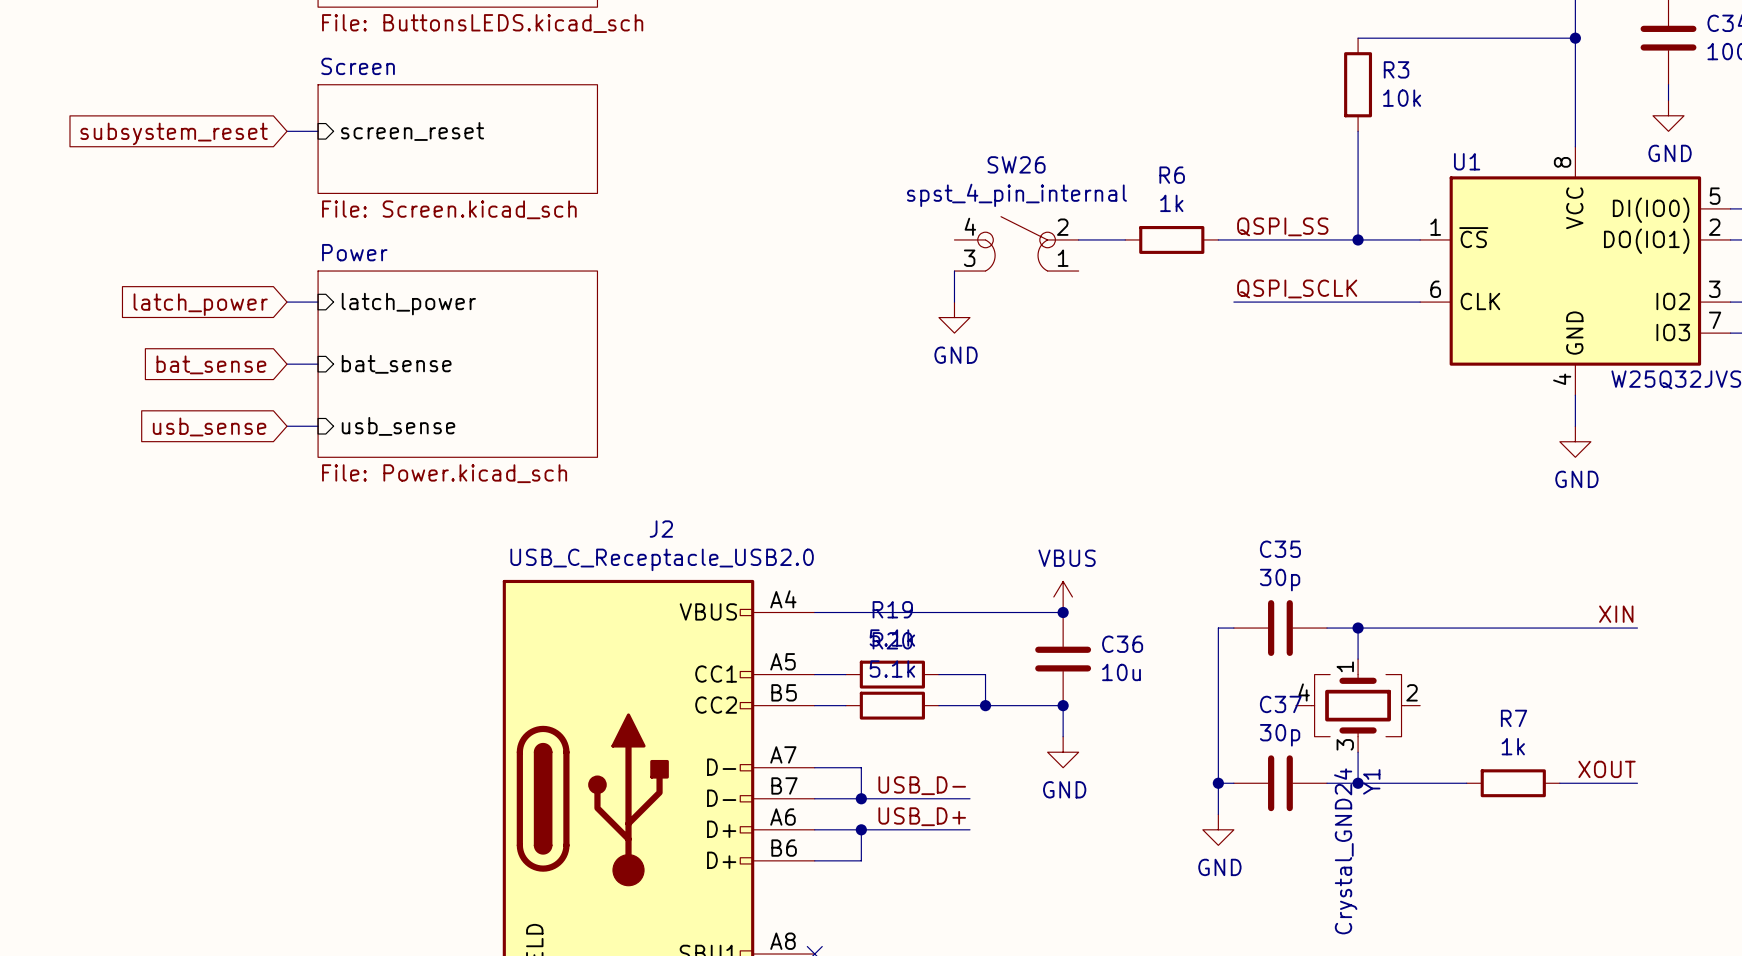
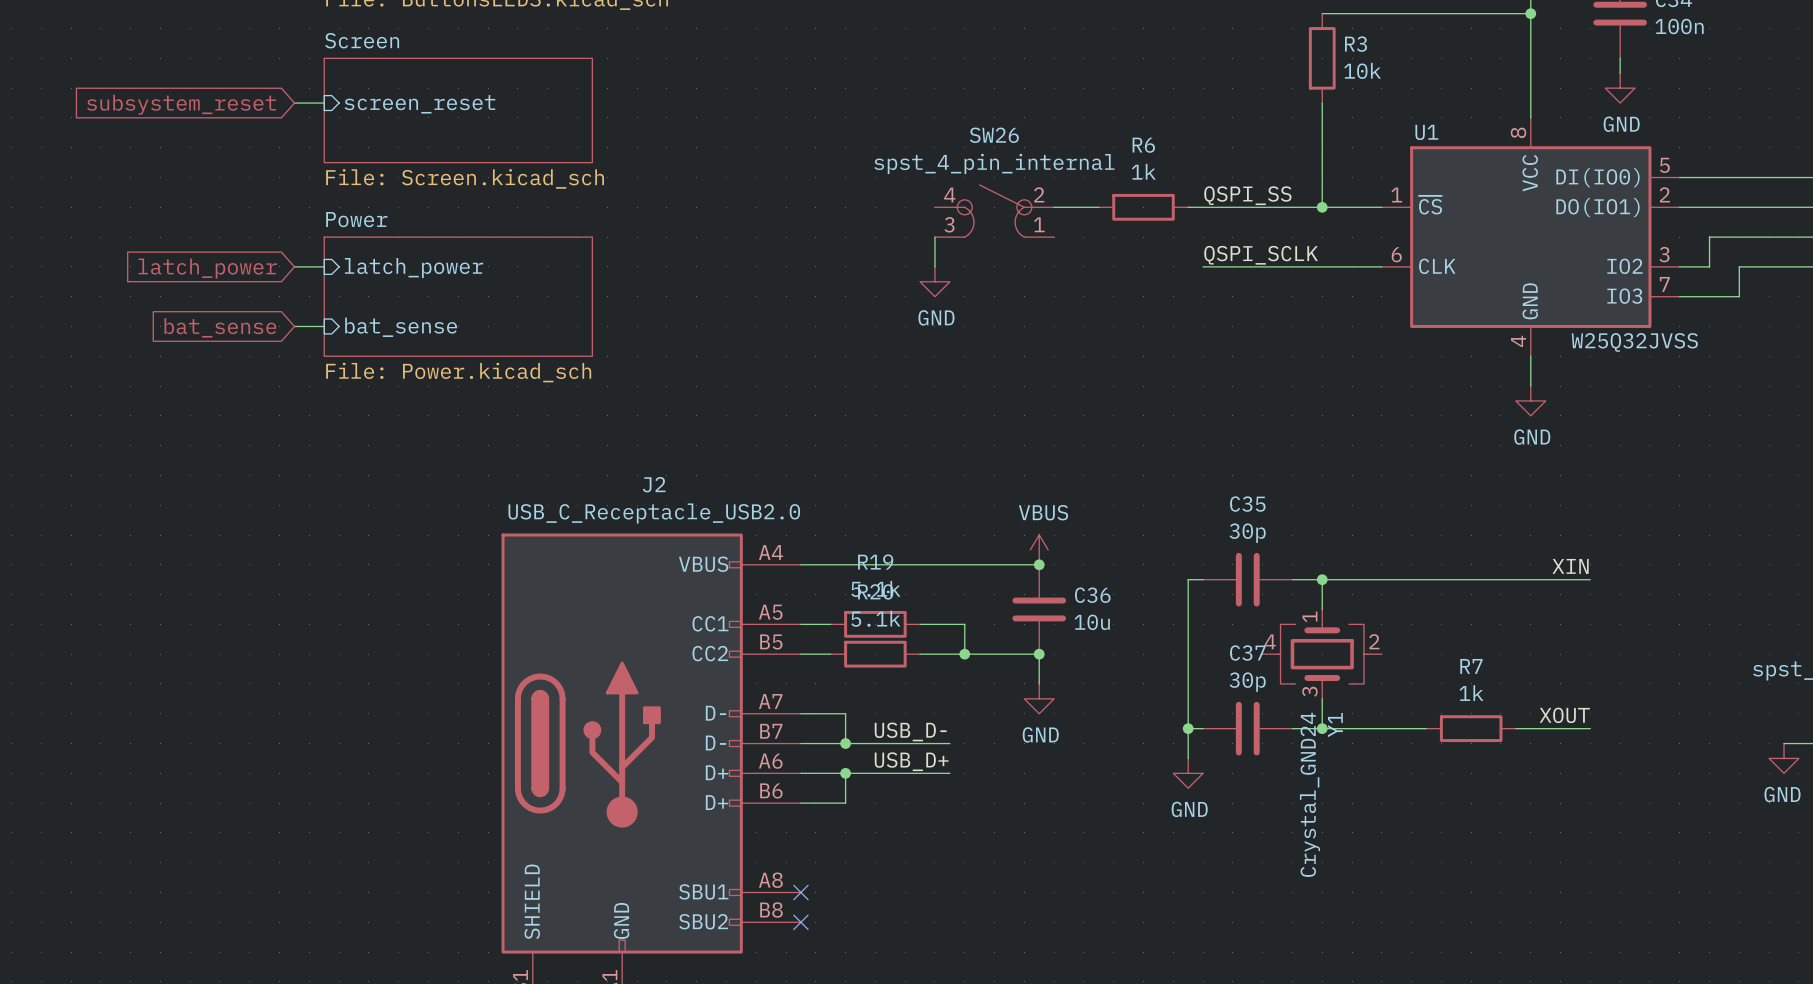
sheet Power: none -> File: Power.kicad_sch (458, 296)
sheet Power: File: Power.kicad_sch (457, 364) -> none
global label: usb_sense (209, 426) -> none
wire: (287, 426) (318, 426) -> none
sheet pin: usb_sense (398, 426) -> none

